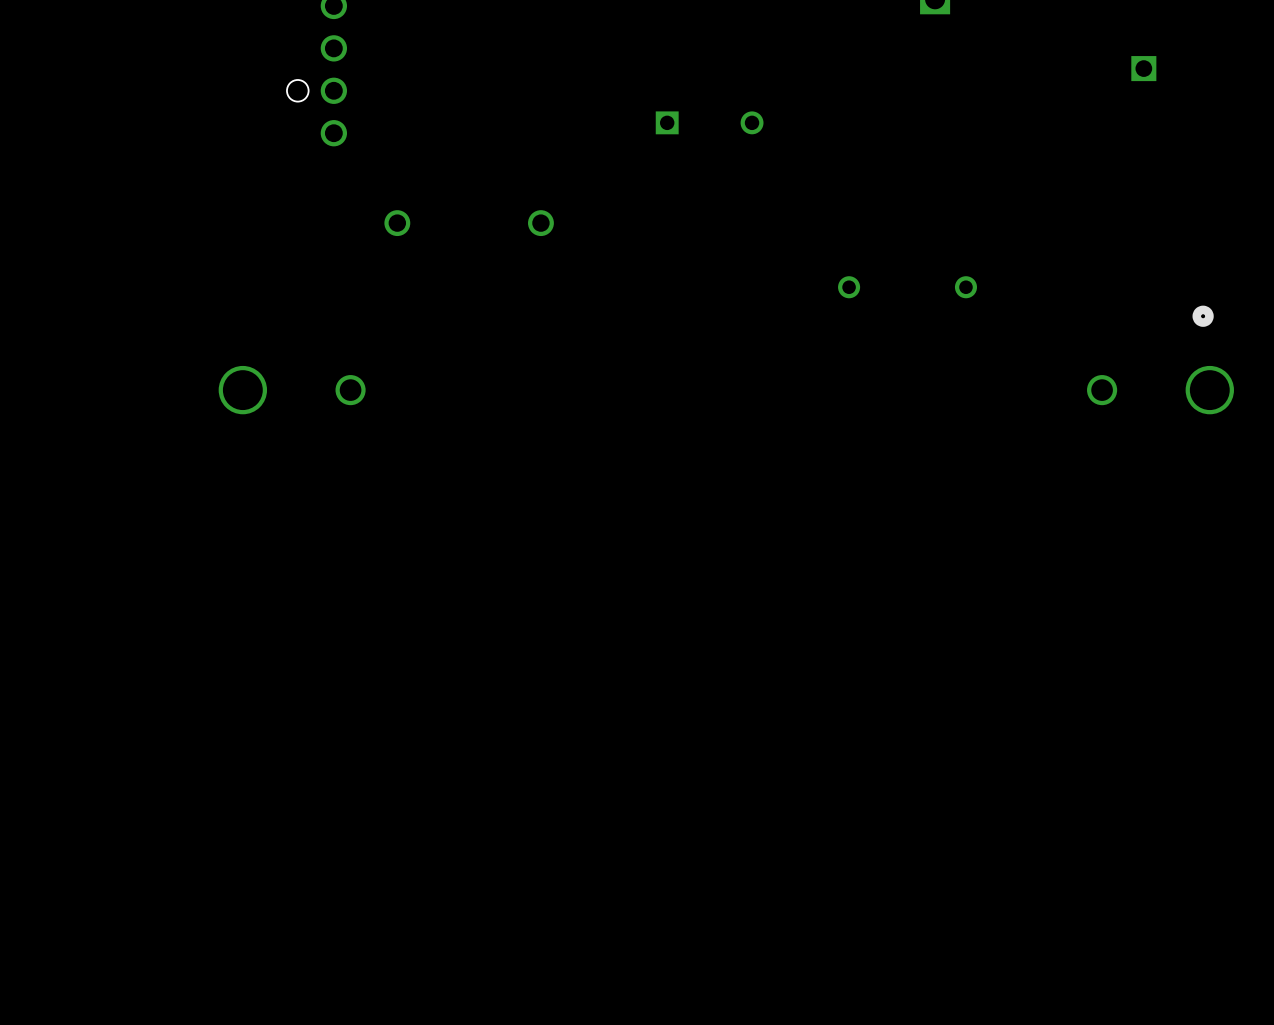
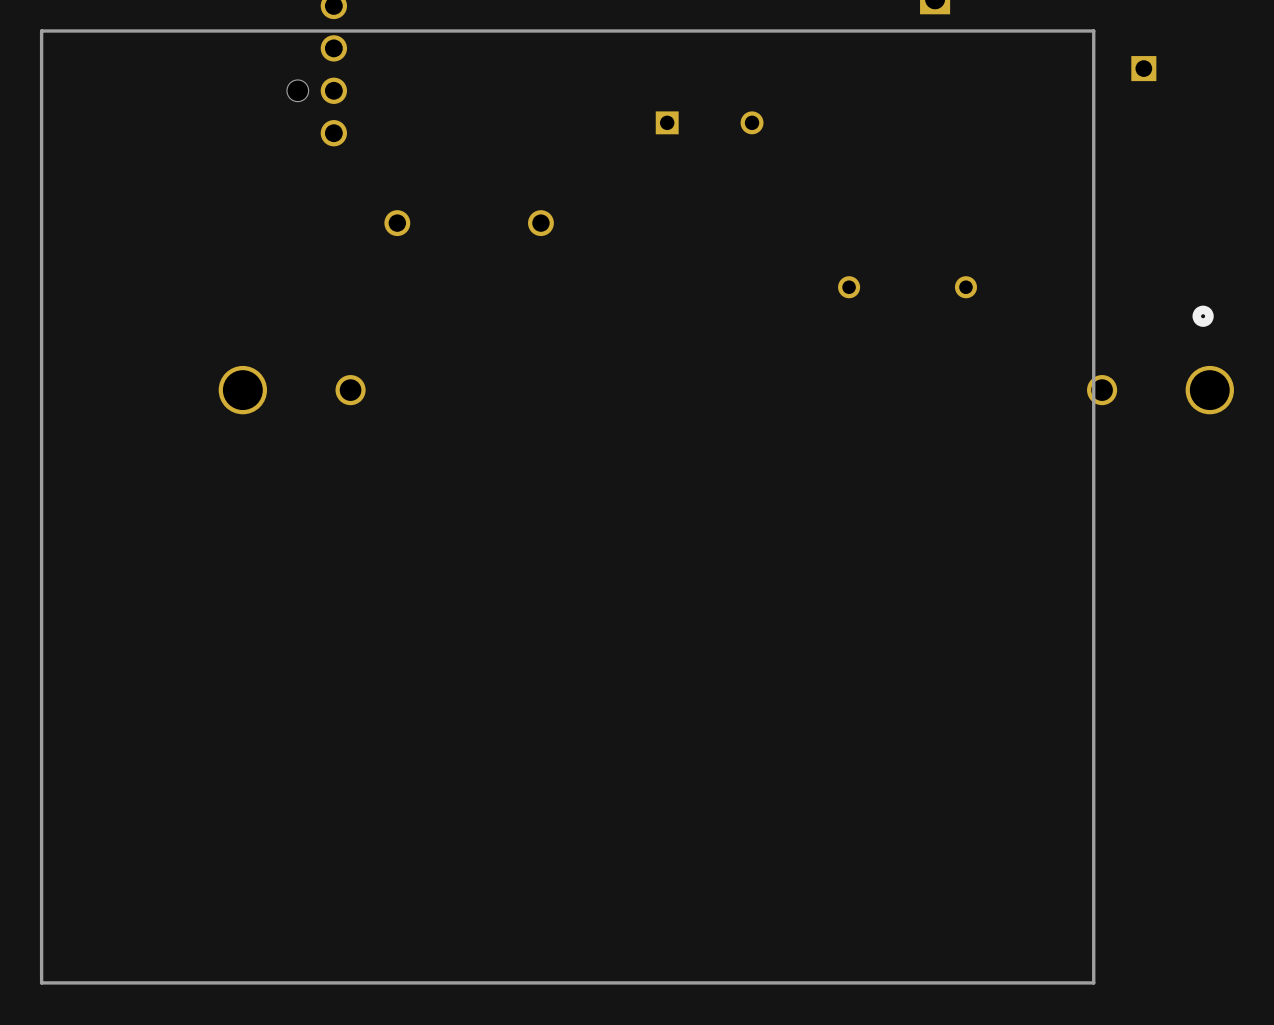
board edge: none -> (1093, 31) (41, 31) (41, 982) (1093, 982) (1093, 31)

